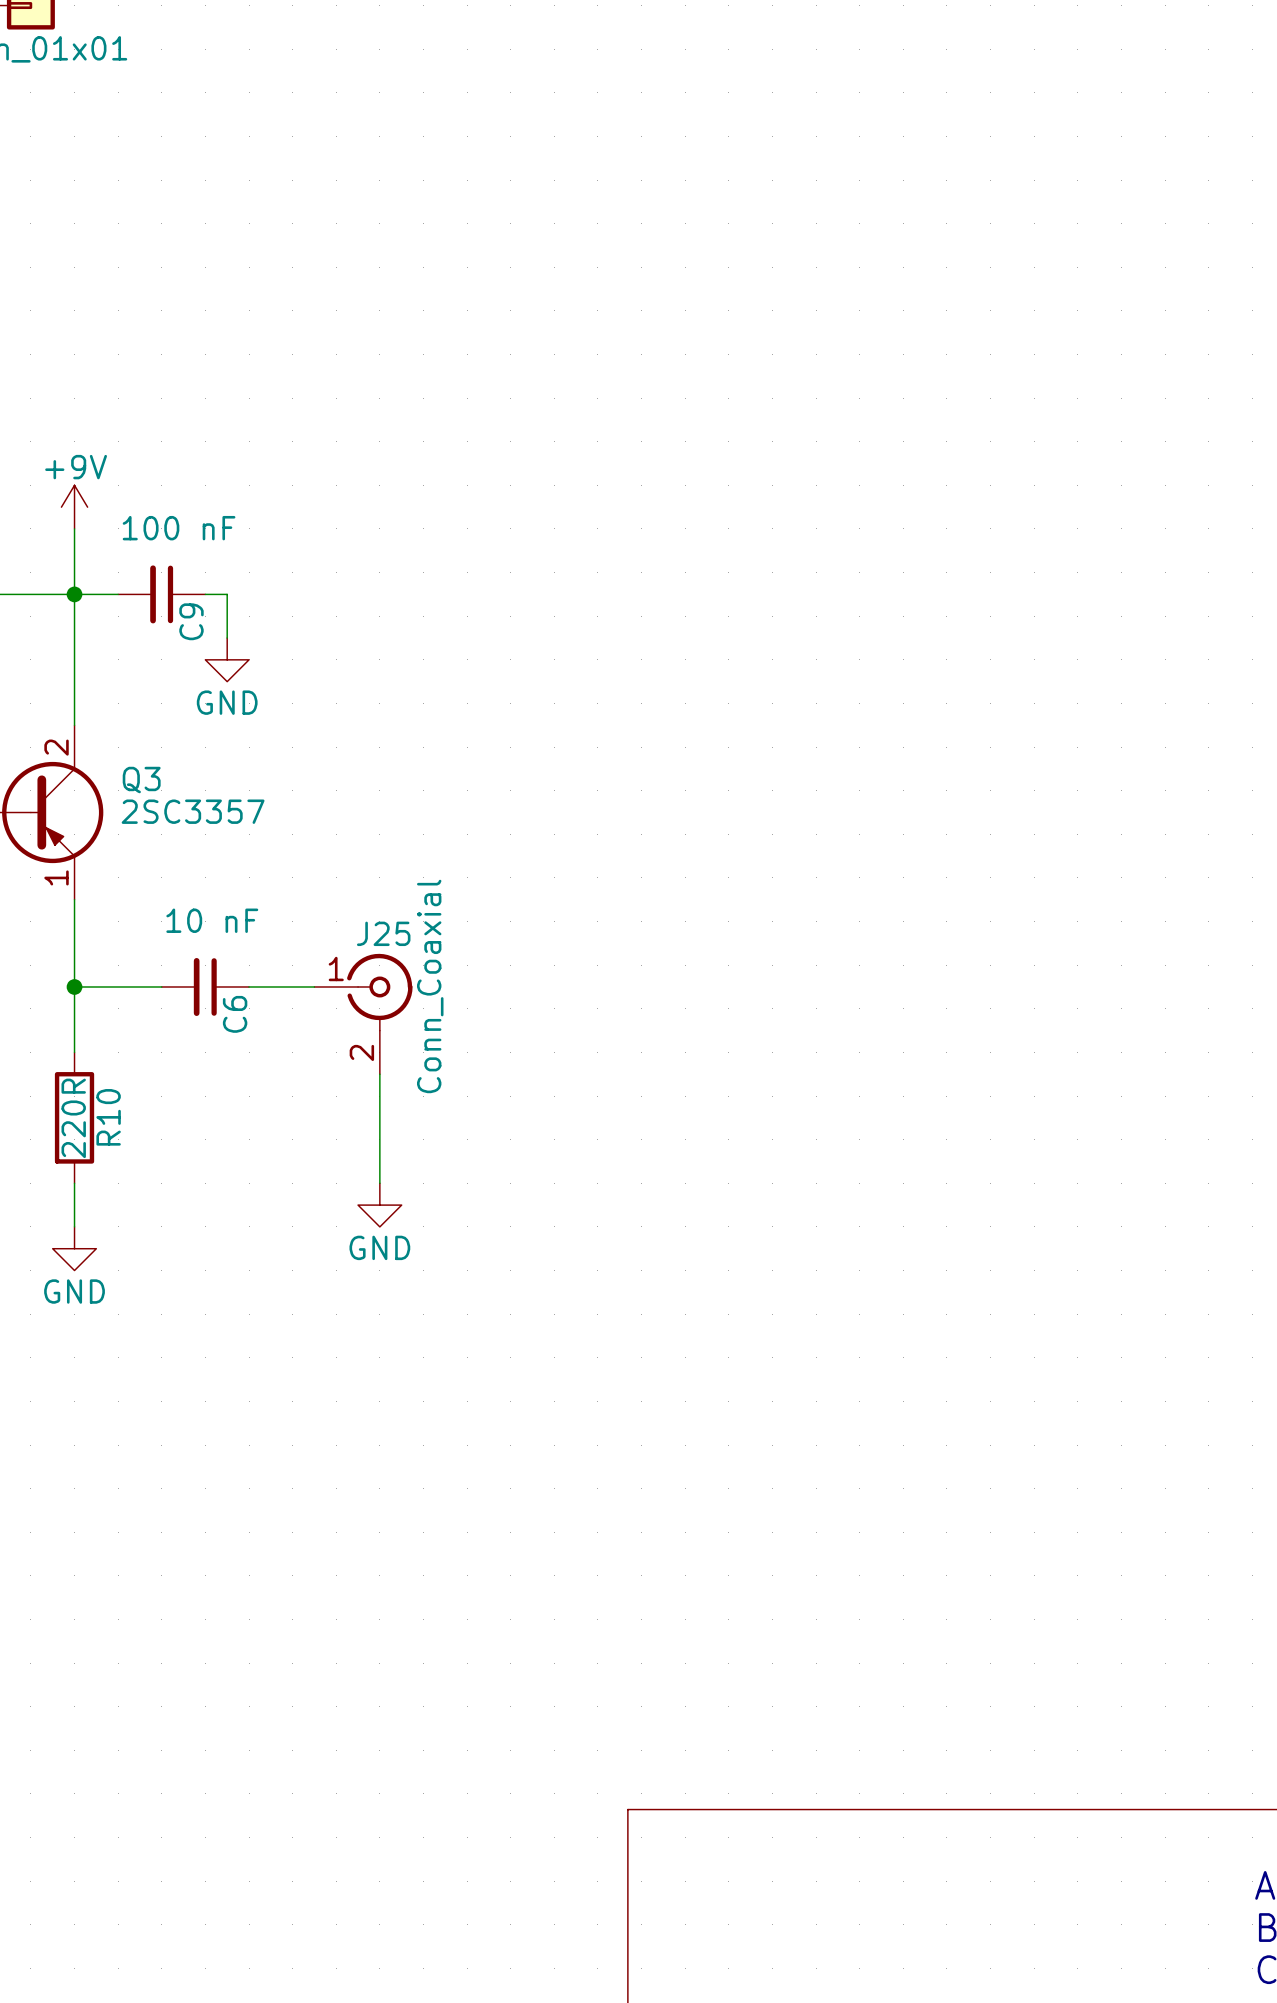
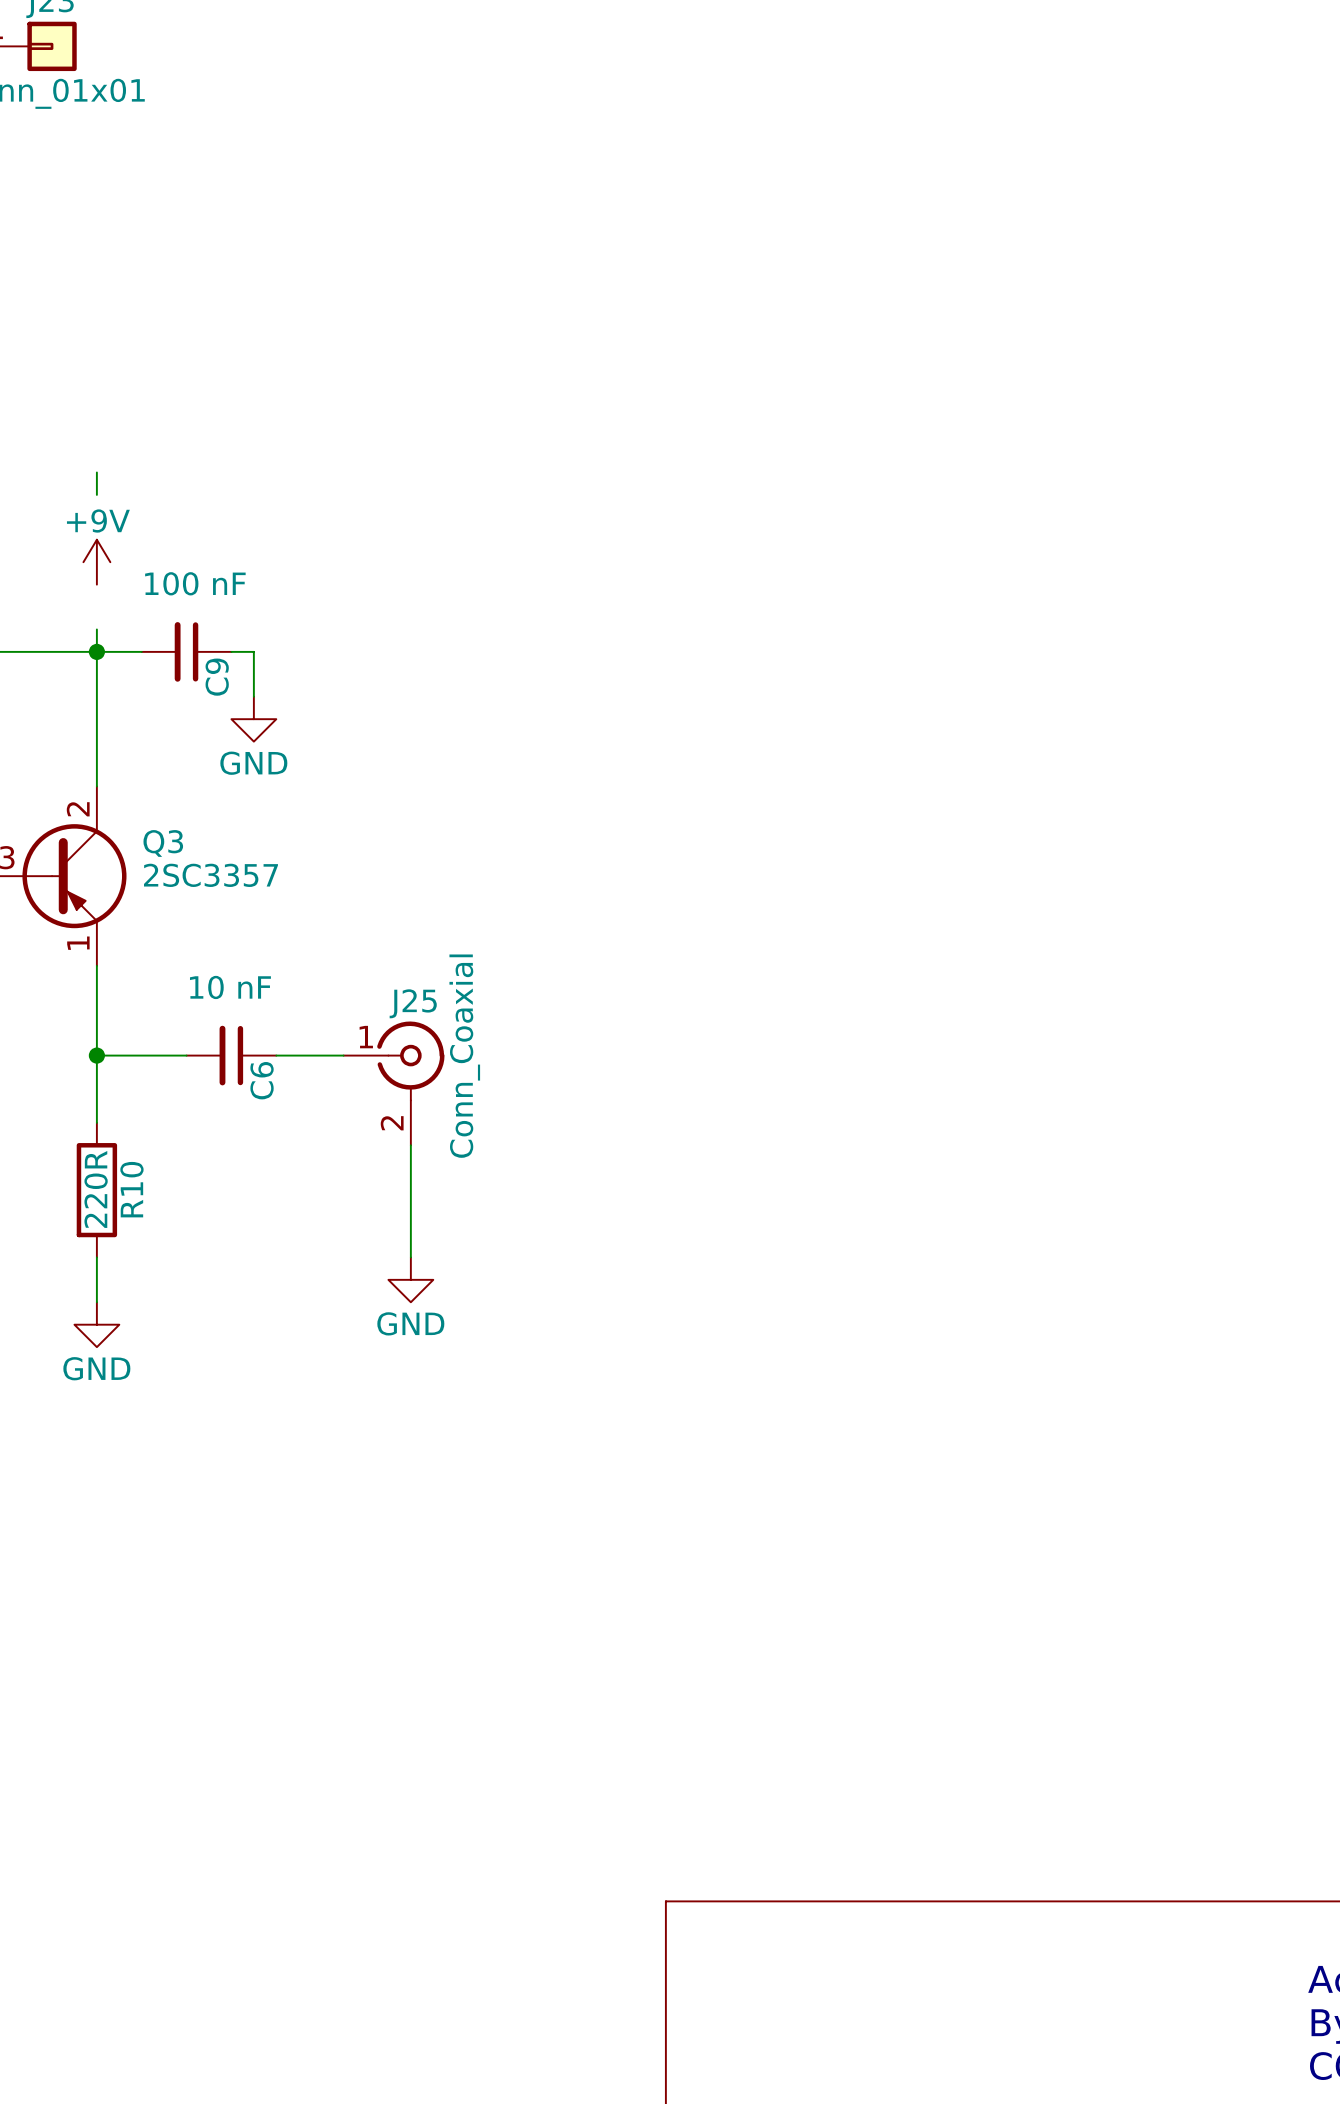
wire: none -> (96, 472) (96, 494)
wire: (74, 528) (74, 572) -> none

